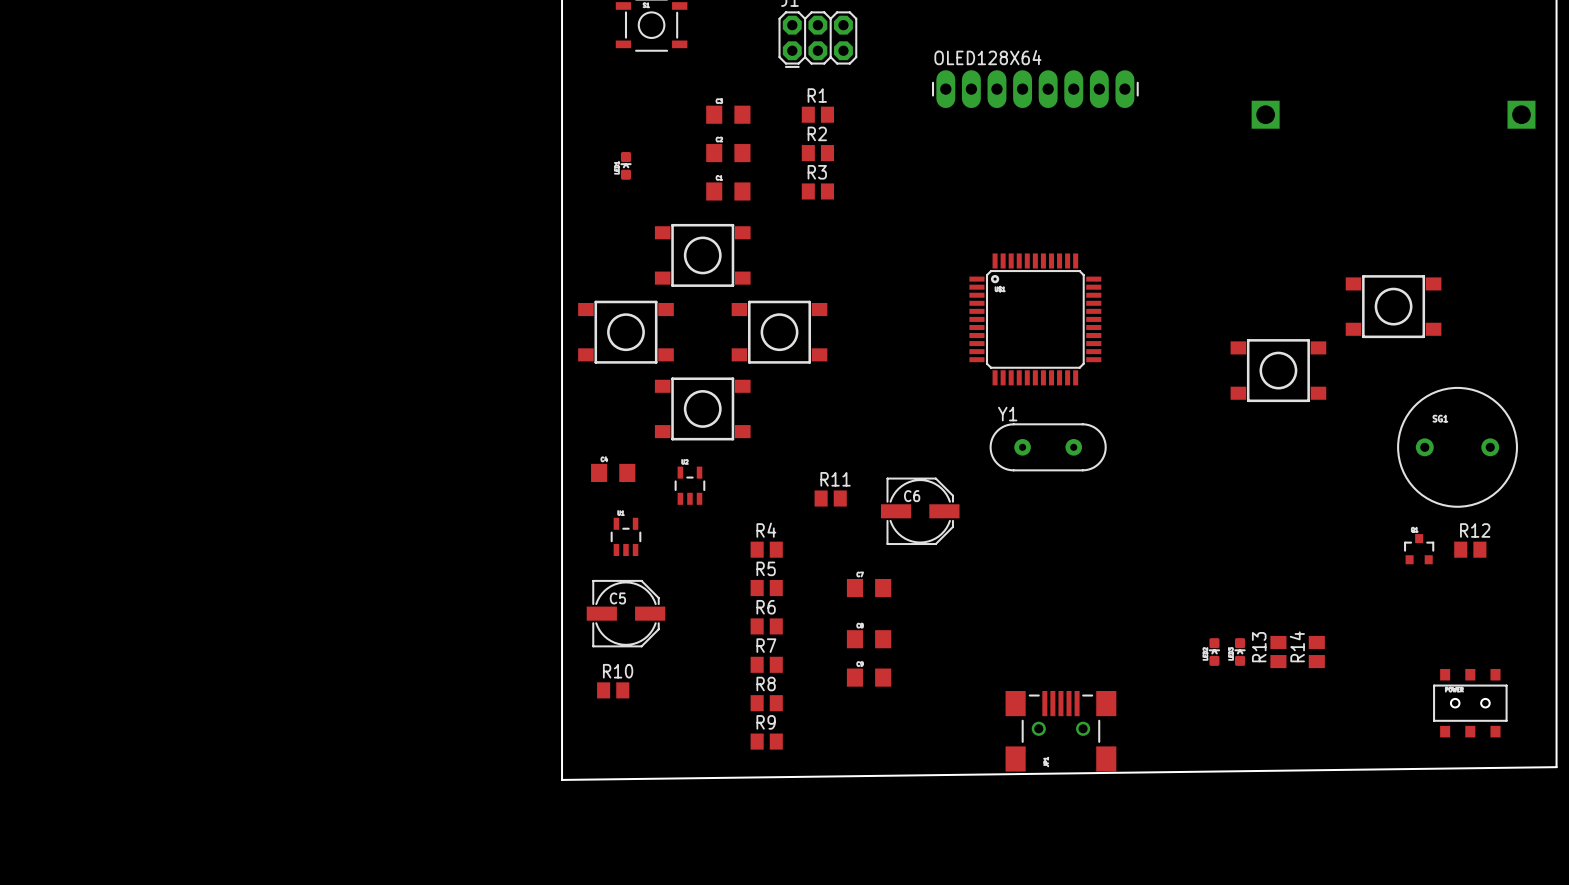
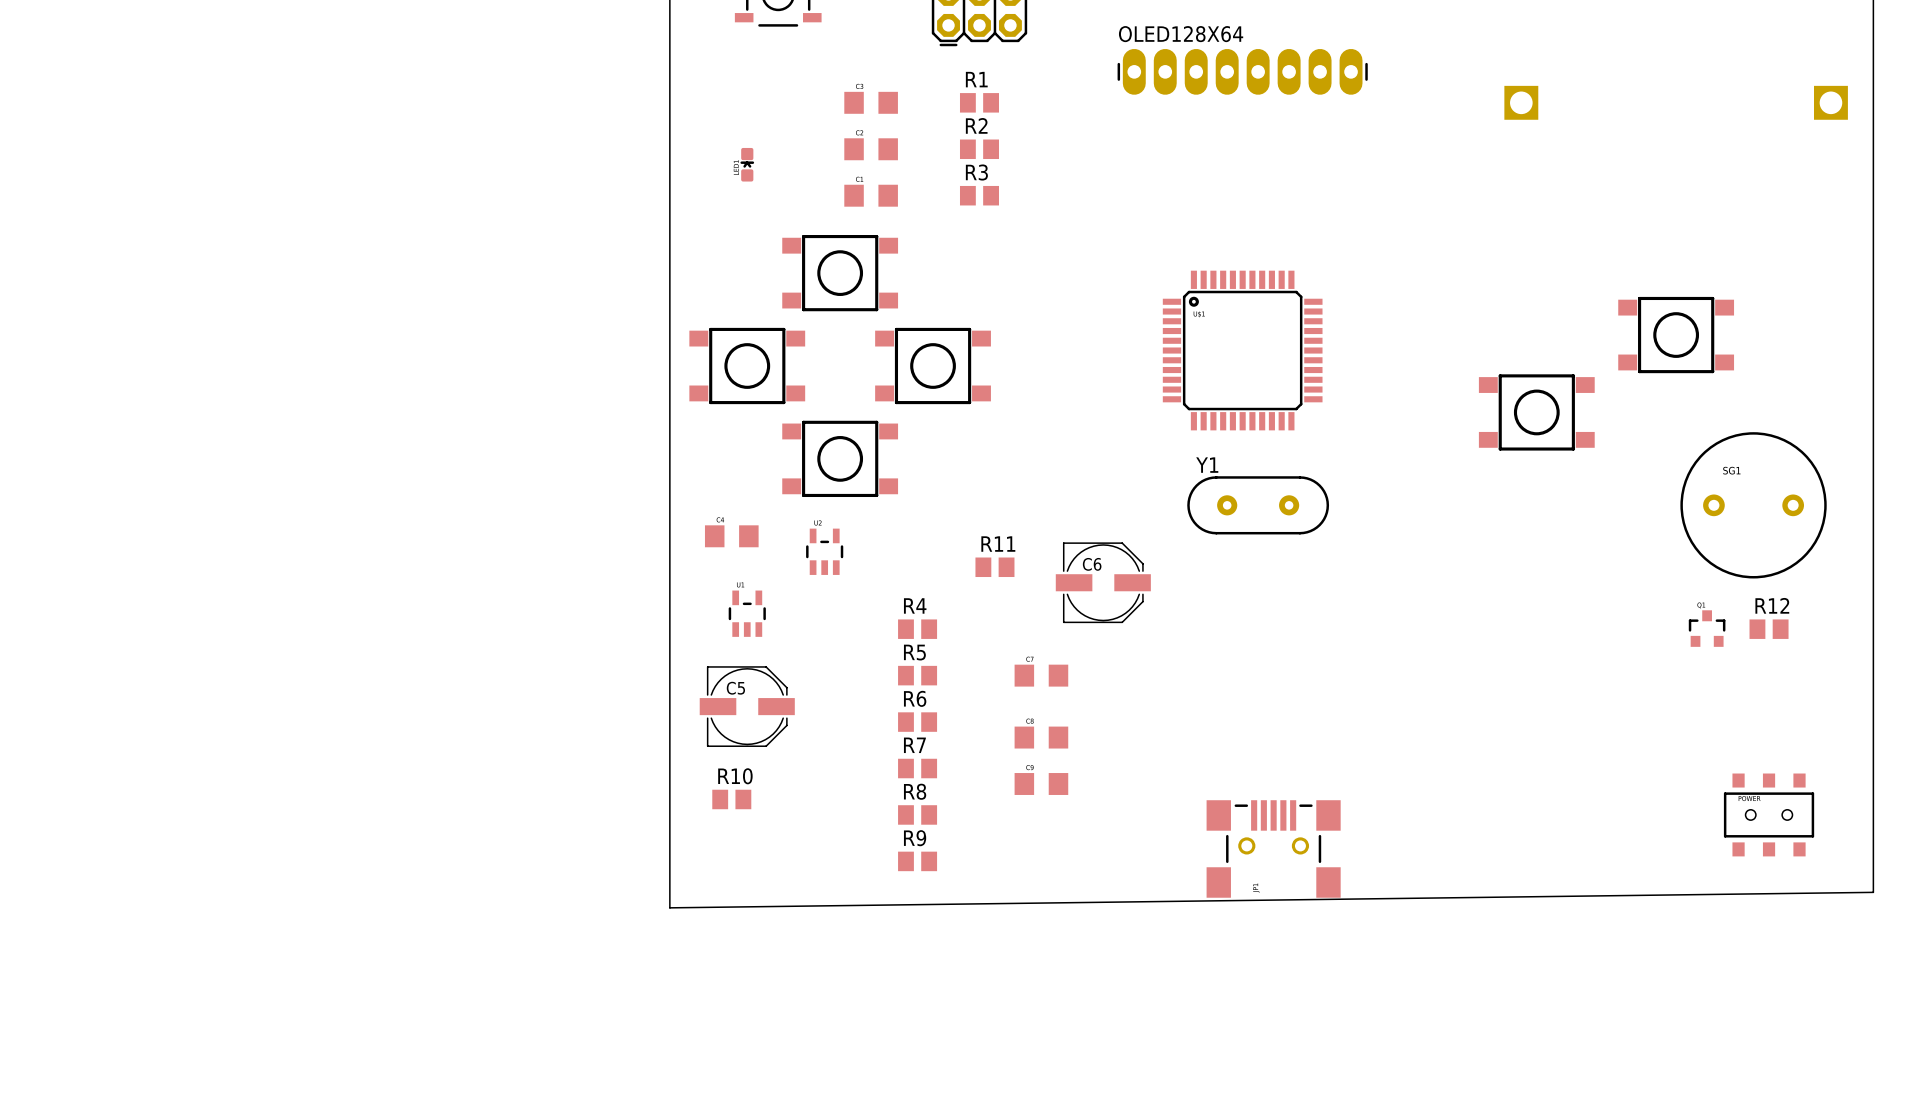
part: (1214, 652) -> none
part: (1240, 652) -> none
R13: (1278, 652) -> none
R14: (1316, 652) -> none

